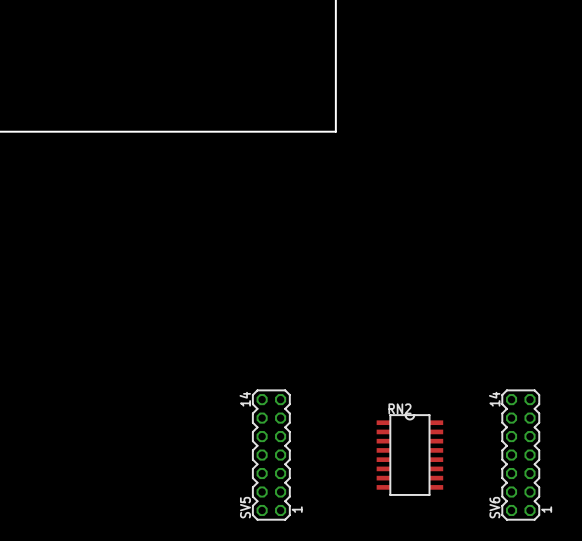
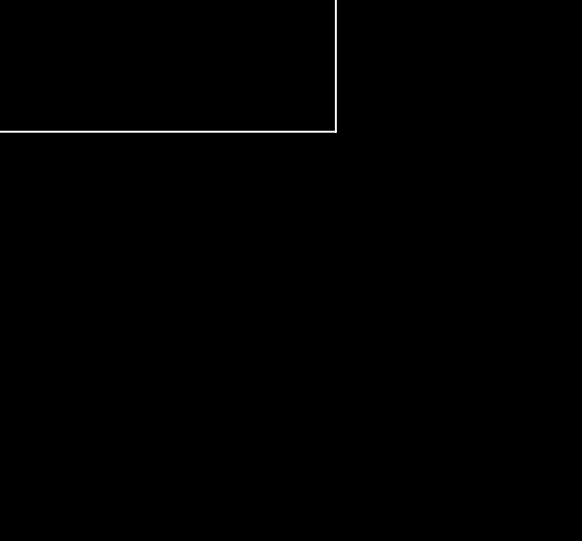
SV5: (271, 455) -> none
RN2: (409, 455) -> none
SV6: (520, 455) -> none

